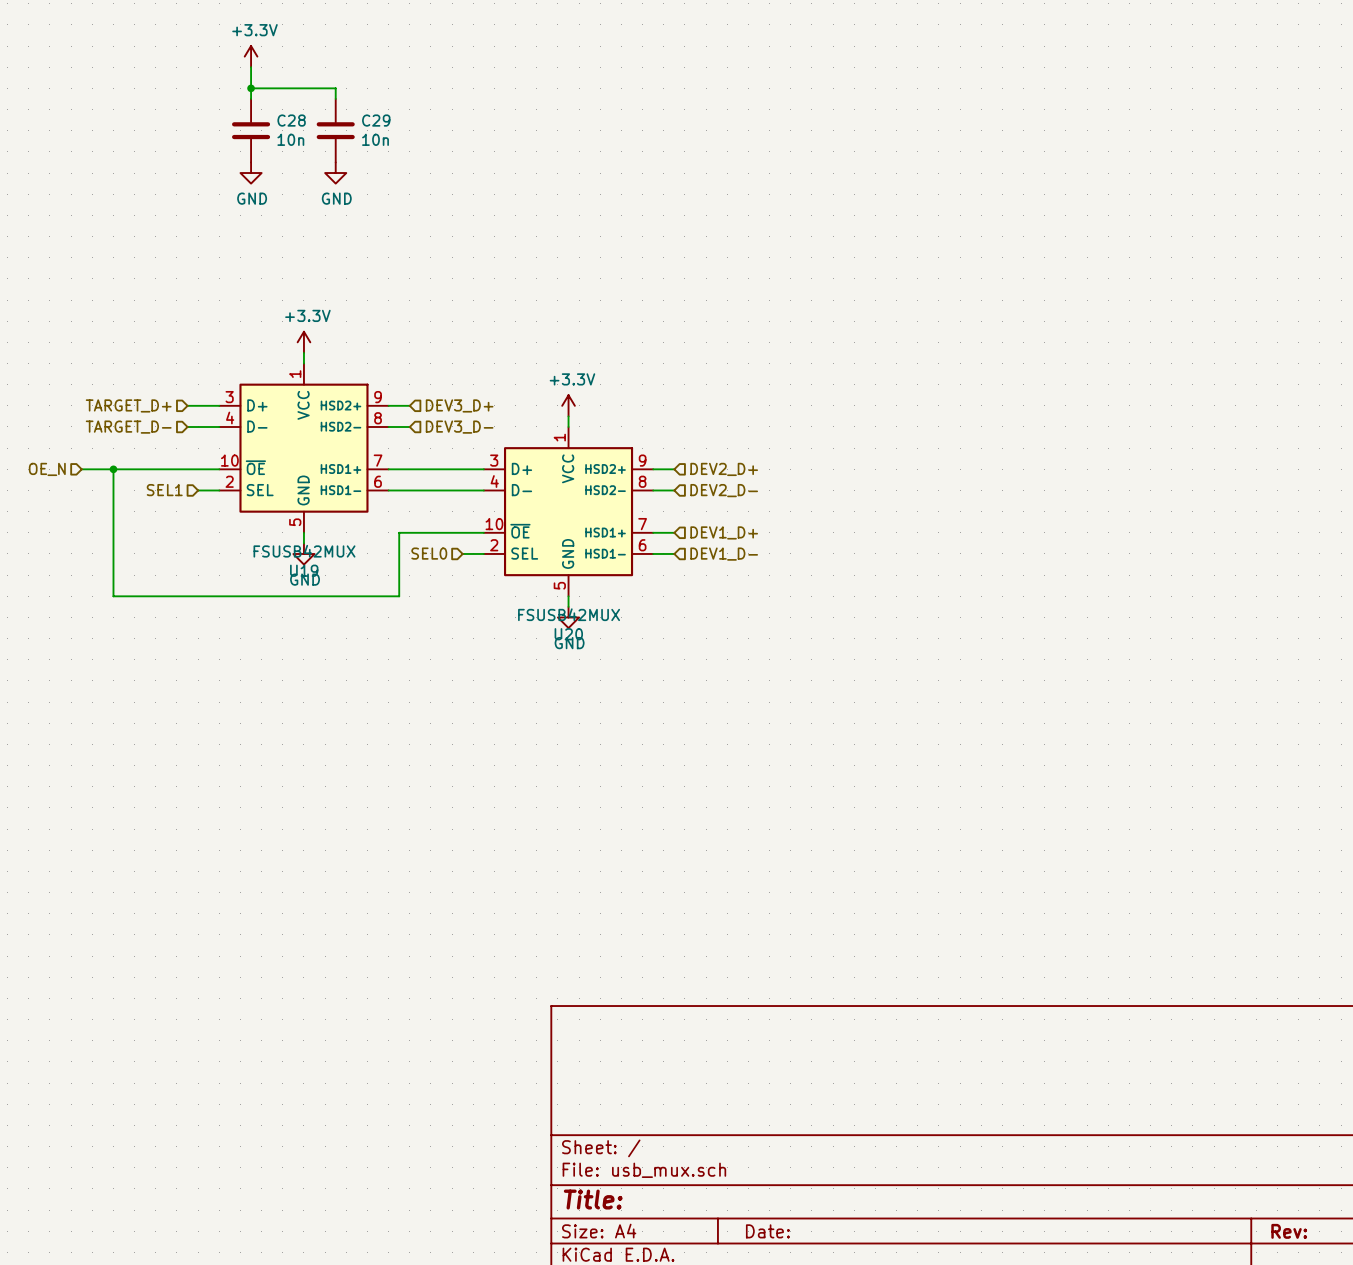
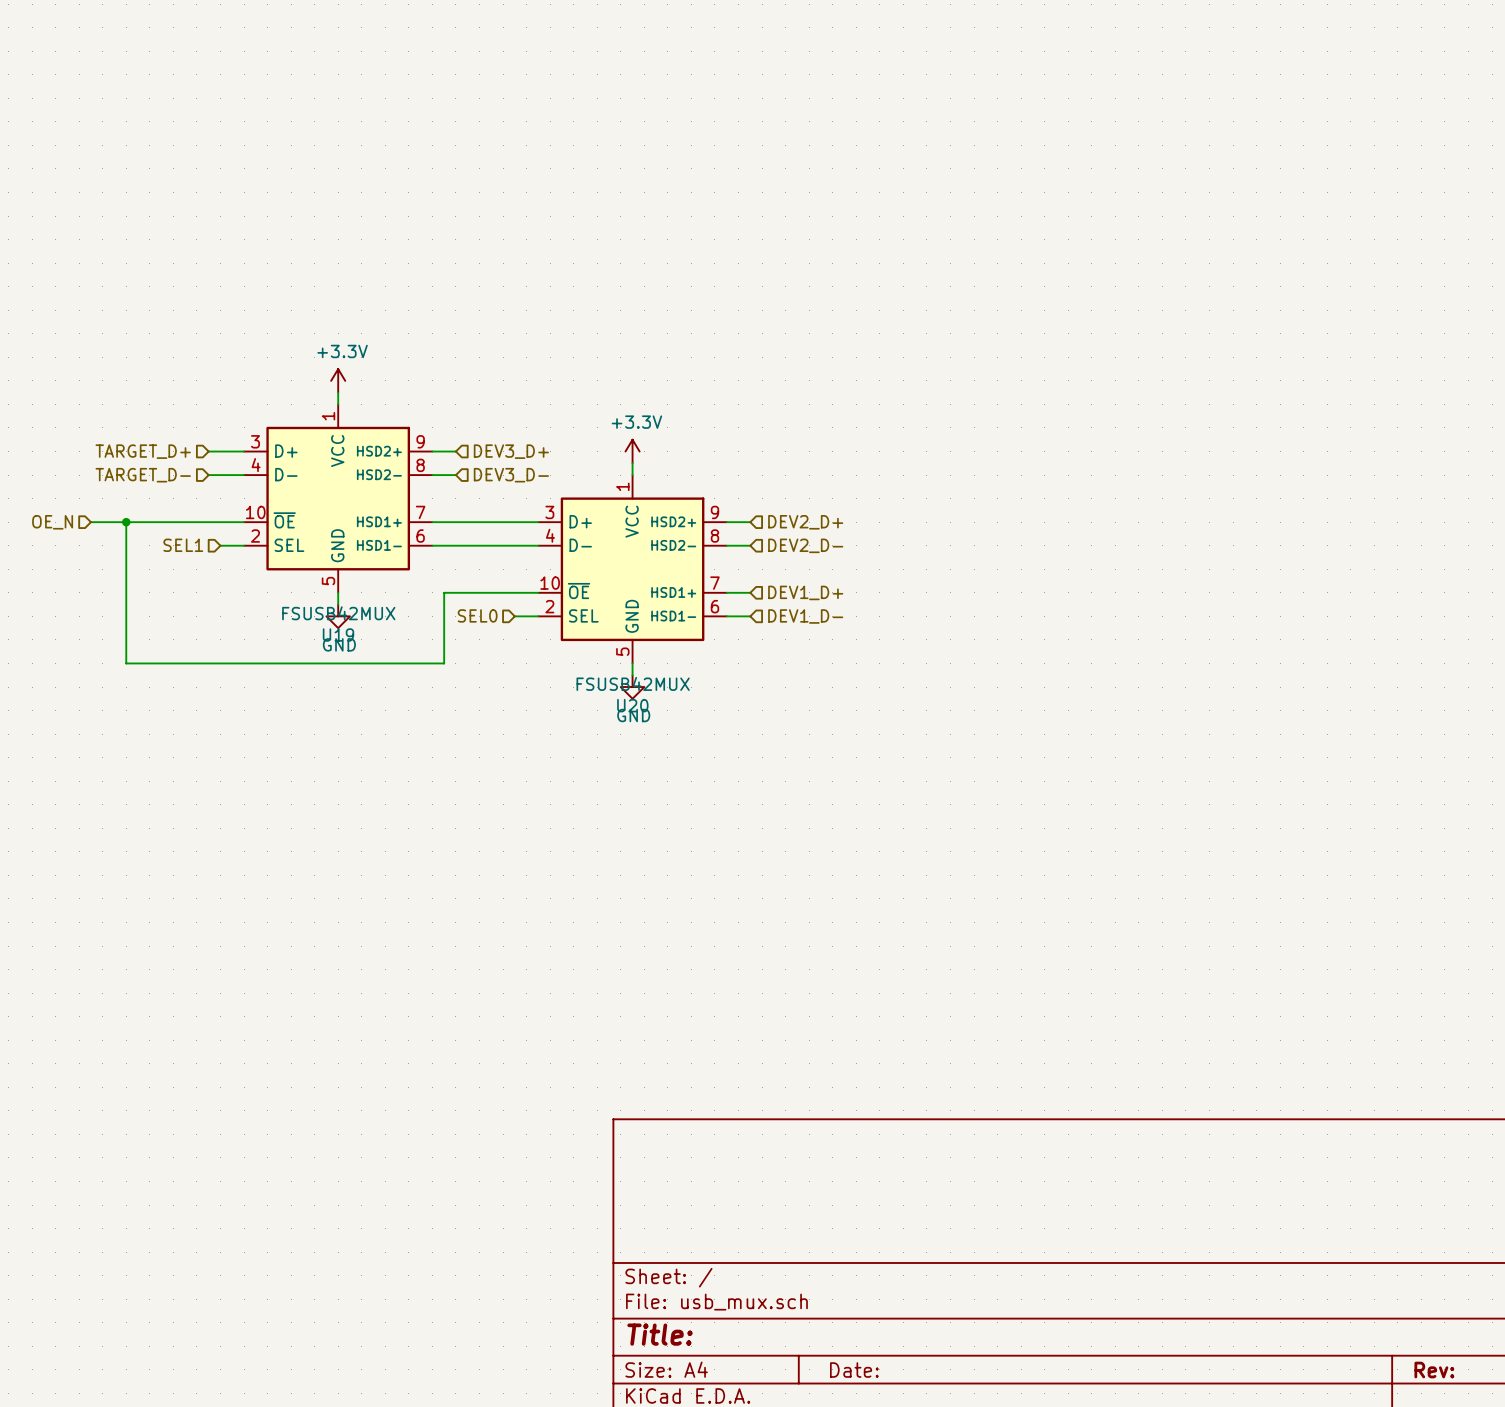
power symbol: +3.3V (251, 56) -> none
wire: (251, 67) (251, 98) -> none
wire: (251, 88) (335, 88) (335, 98) -> none
junction: (251, 88) -> none
C28: 10n (251, 130) -> none
C29: 10n (335, 130) -> none
power symbol: GND (251, 173) -> none
power symbol: GND (335, 173) -> none

